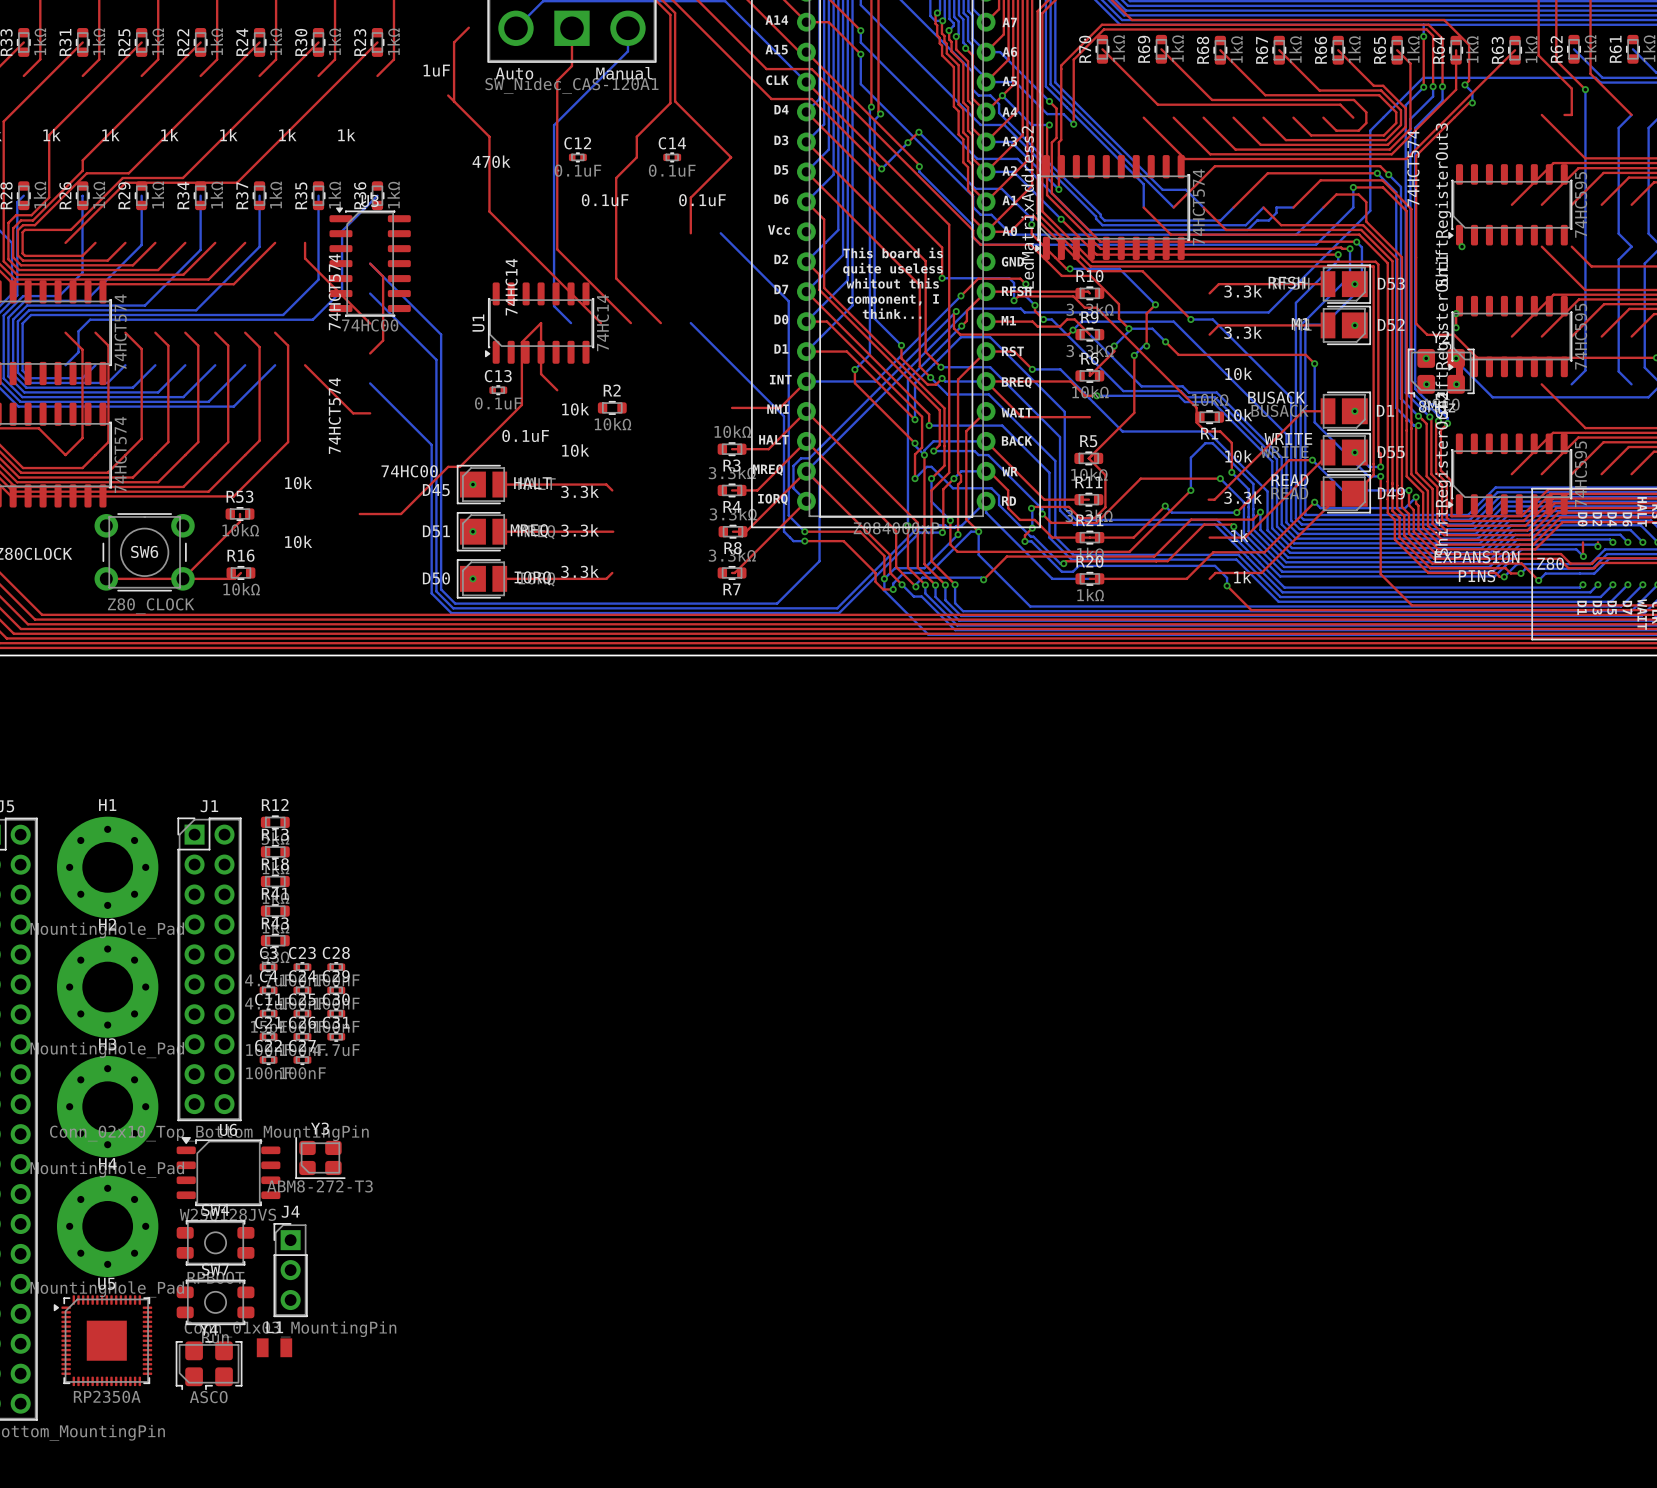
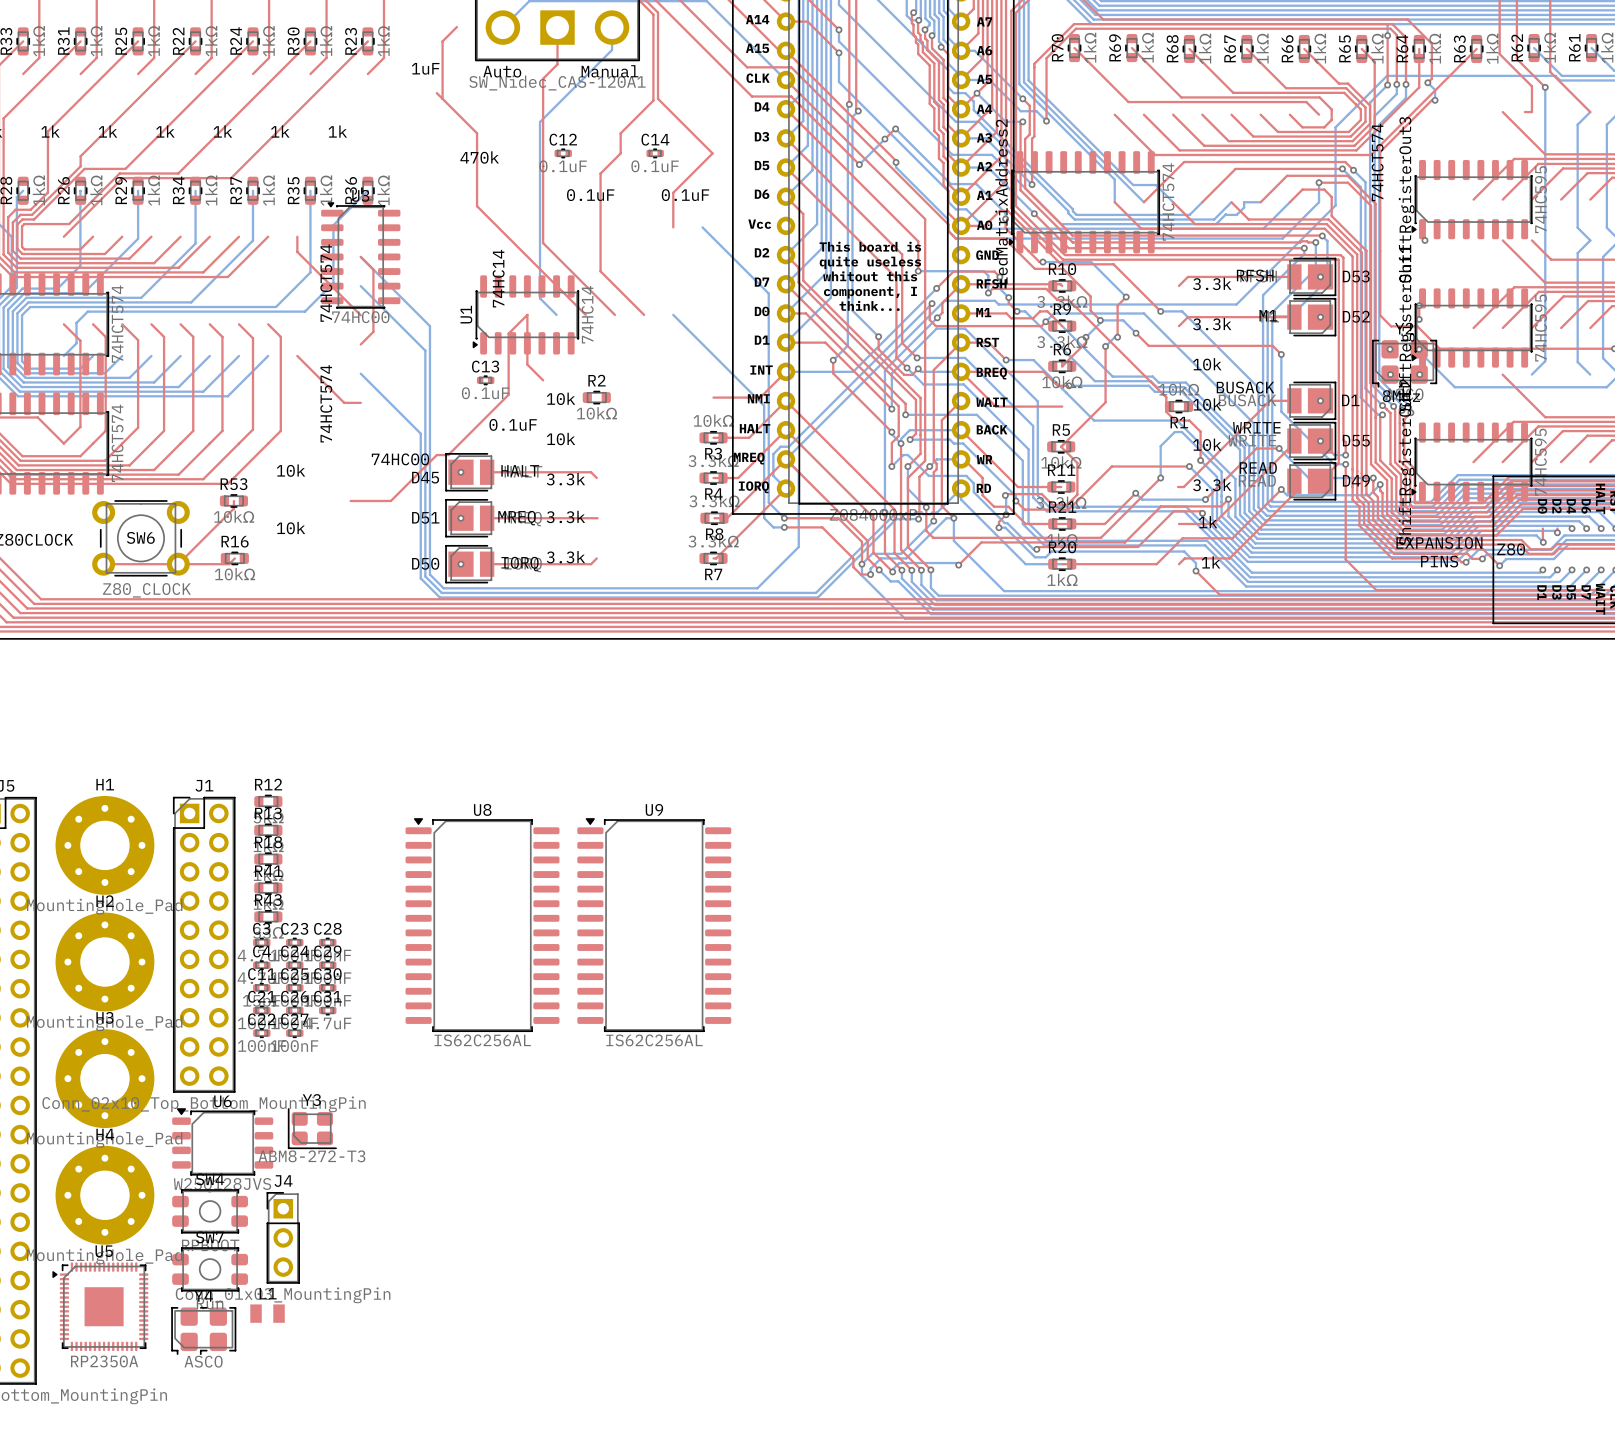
U8: none -> IS62C256AL (482, 925)
U9: none -> IS62C256AL (654, 925)

